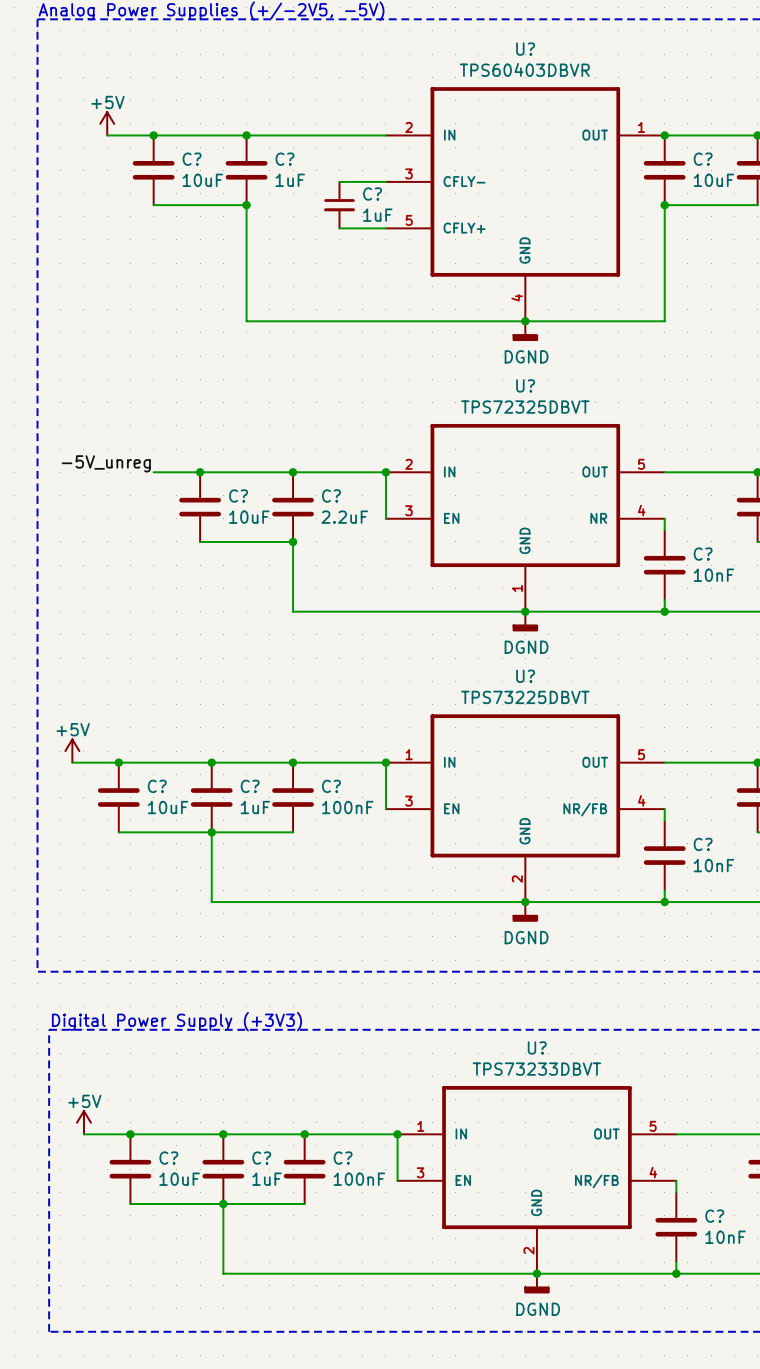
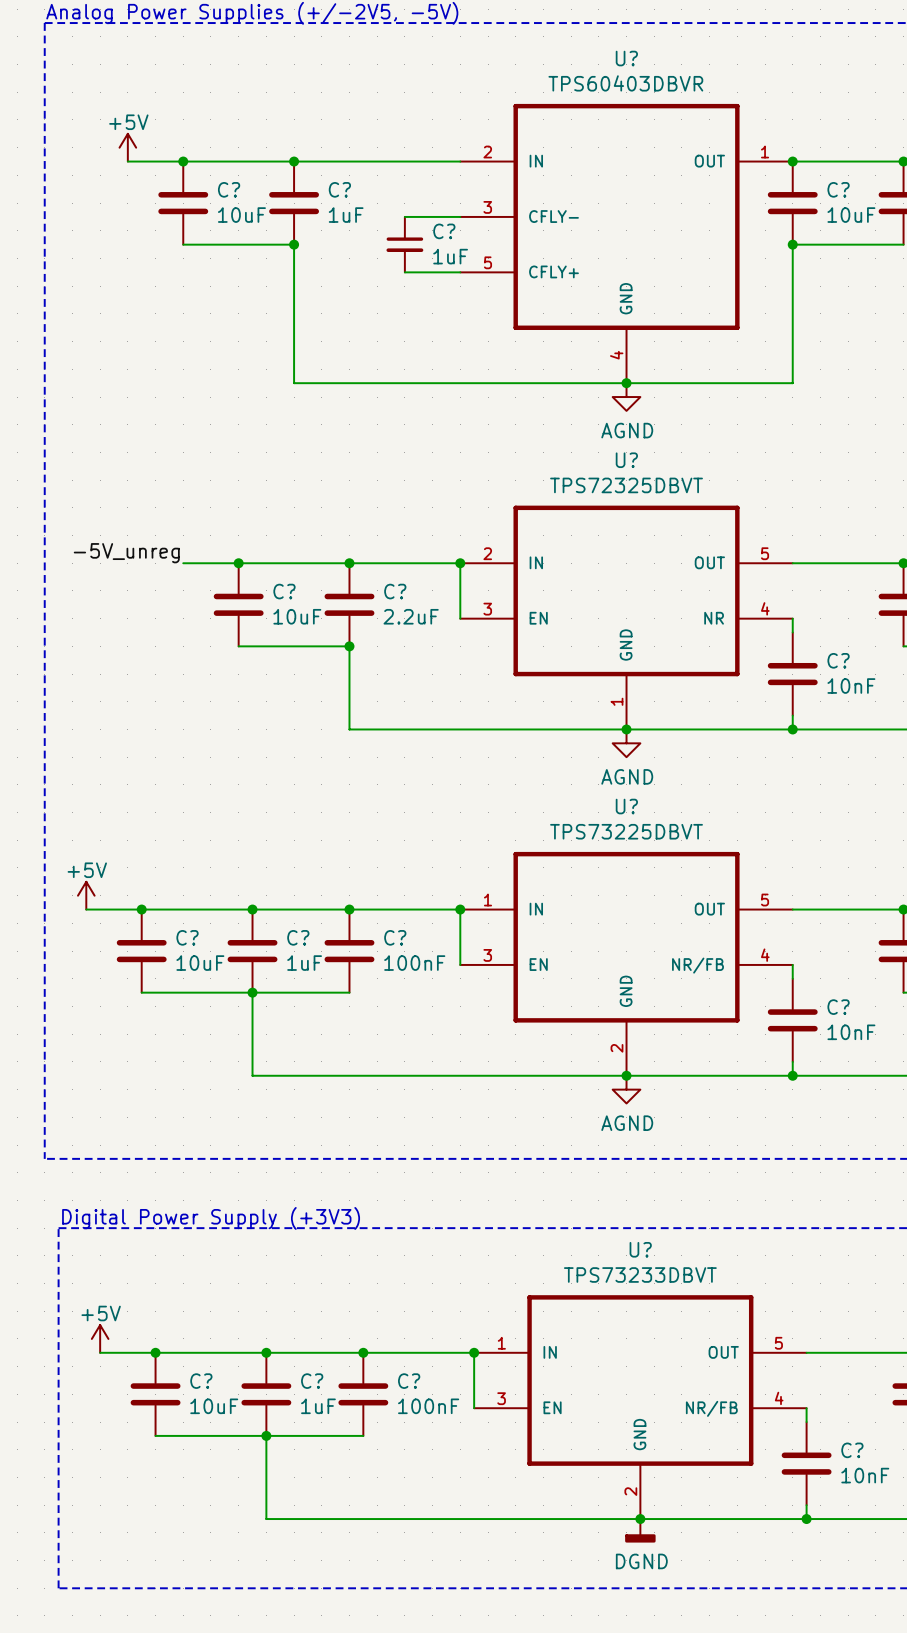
power symbol: DGND (525, 331) -> AGND (626, 397)
power symbol: DGND (525, 621) -> AGND (626, 743)
power symbol: DGND (525, 911) -> AGND (626, 1089)

